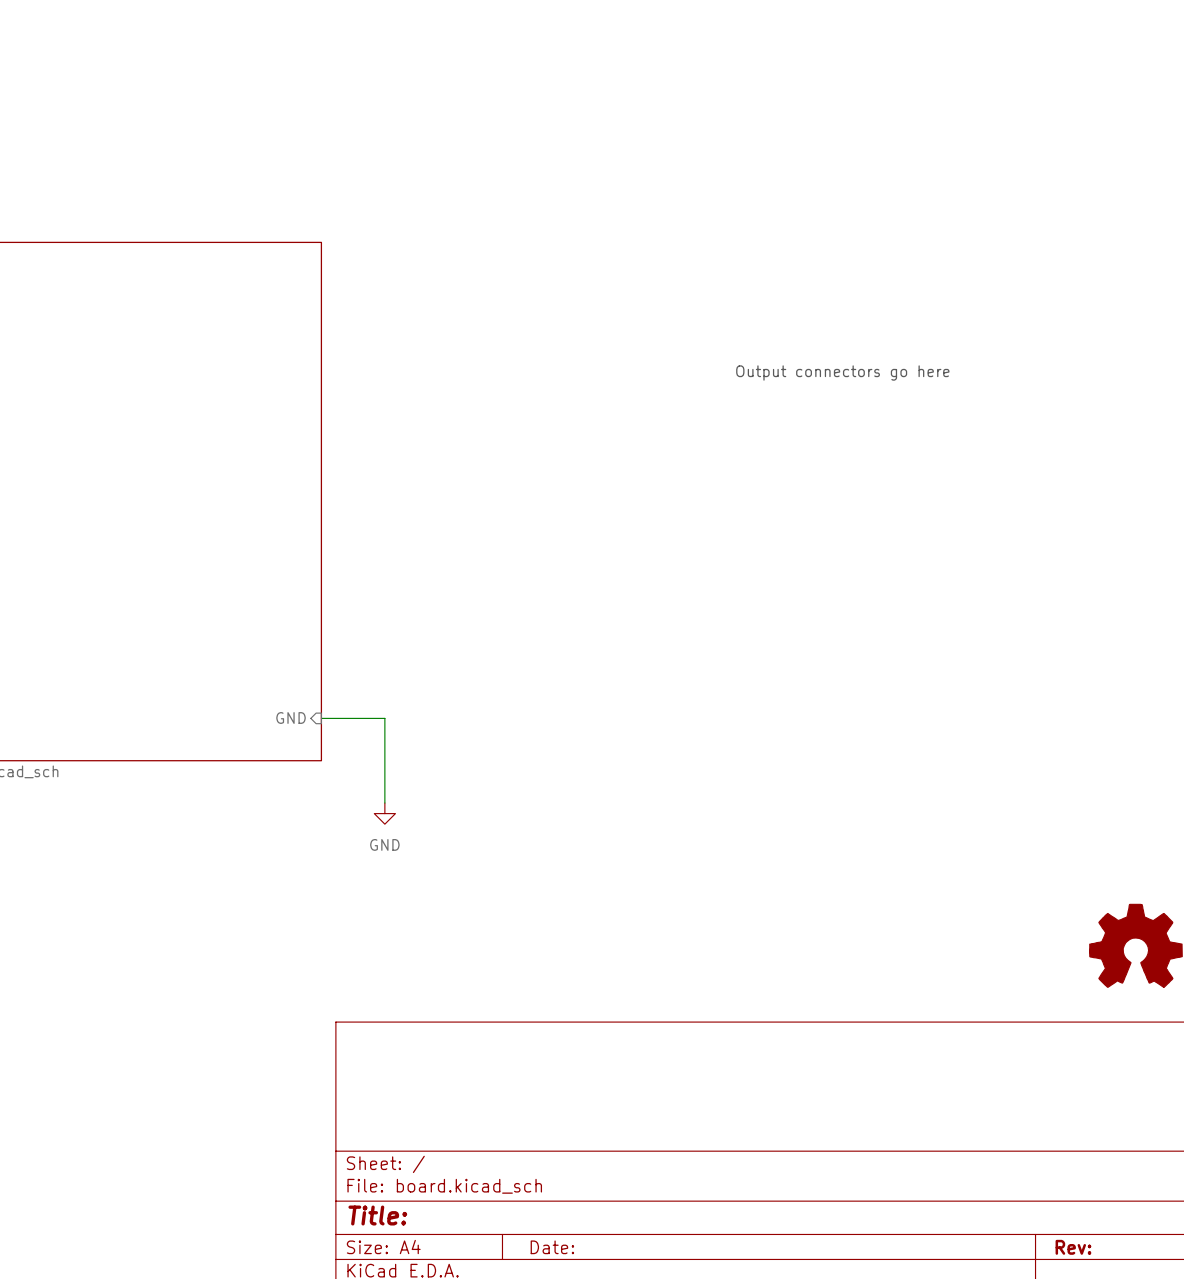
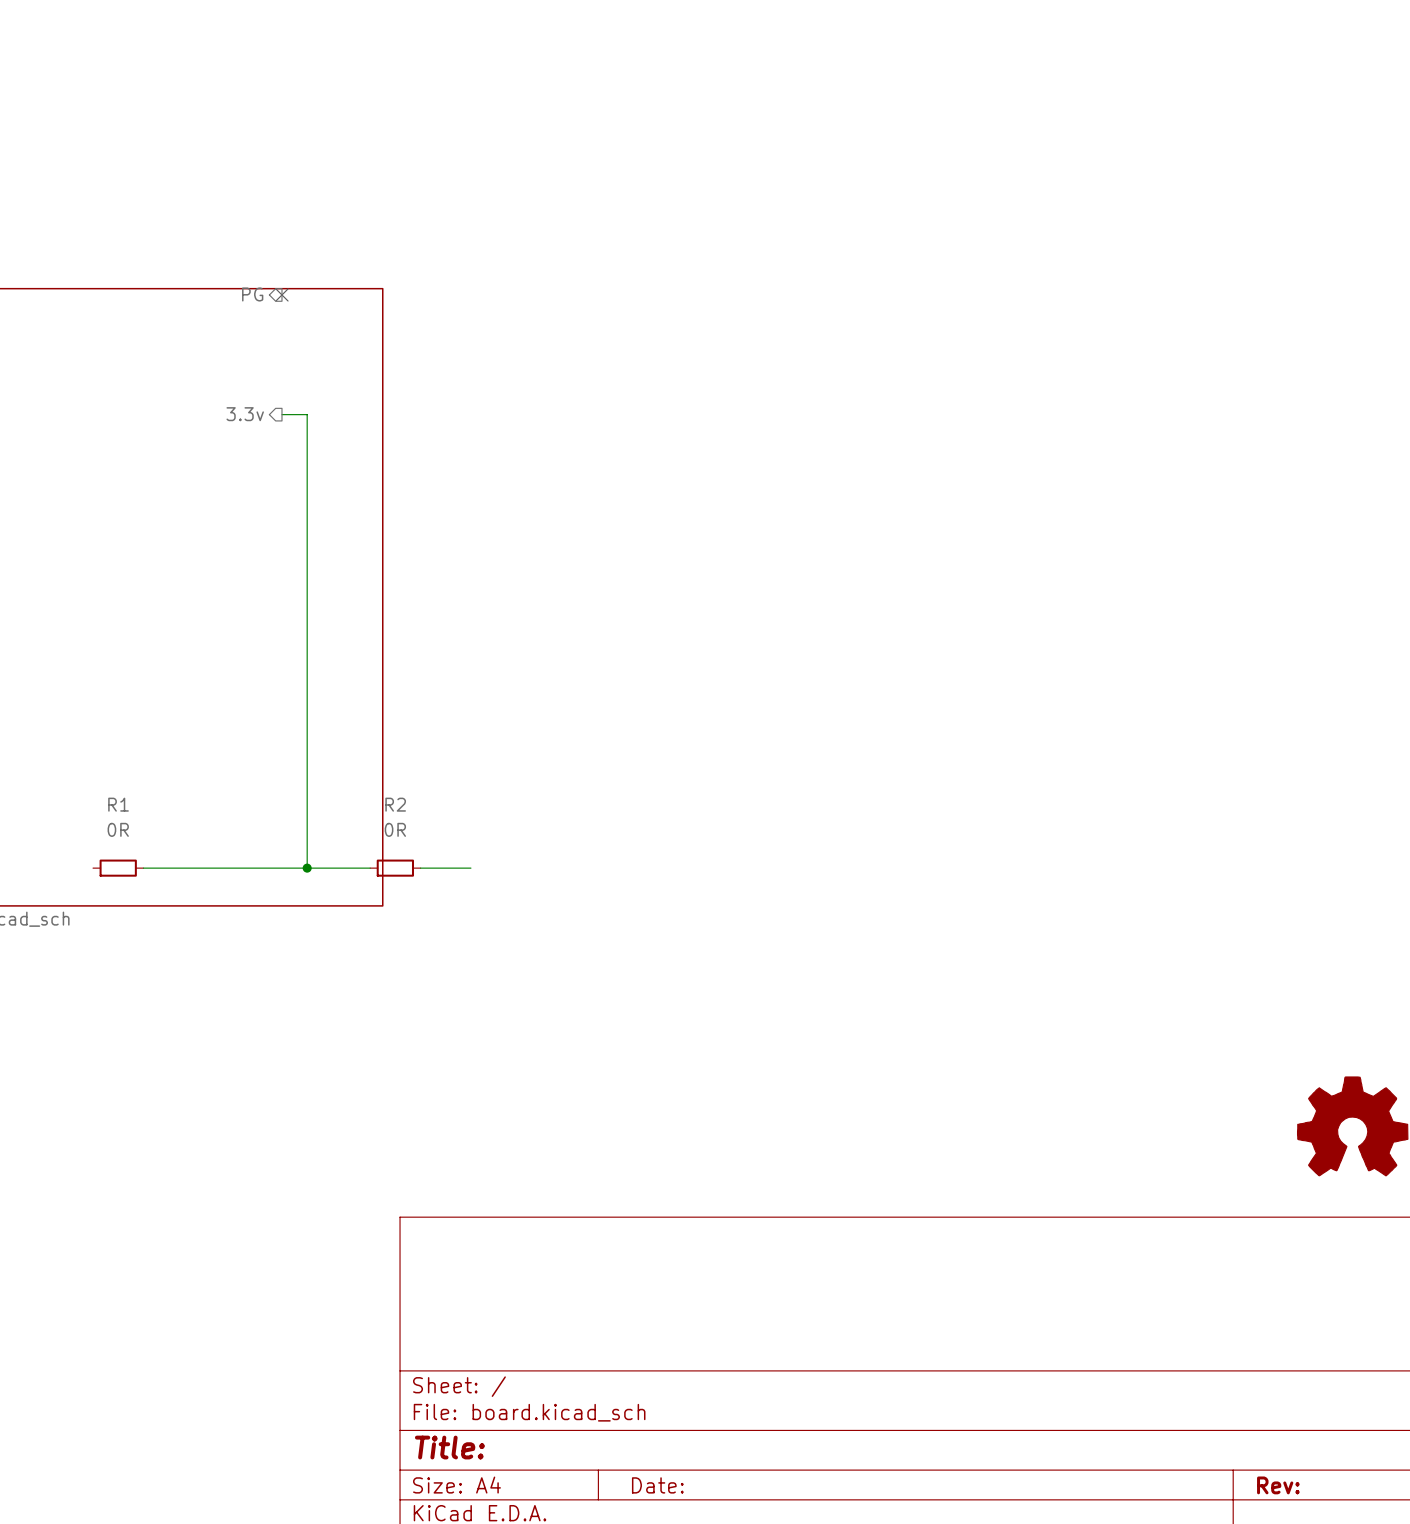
sheet pin: none -> PG (252, 294)
no-connect mark: none -> (281, 294)
sheet pin: none -> 3.3v (245, 414)
wire: none -> (281, 414) (307, 414) (307, 868)
text: Output connectors go here (842, 373) -> none
sheet pin: GND (291, 718) -> none
wire: (321, 718) (384, 718) (384, 803) -> none
R1: none -> 0R (118, 868)
wire: none -> (143, 868) (370, 868)
junction: none -> (307, 868)
R2: none -> 0R (395, 868)
wire: none -> (420, 868) (470, 868)
power symbol: GND (384, 813) -> none

